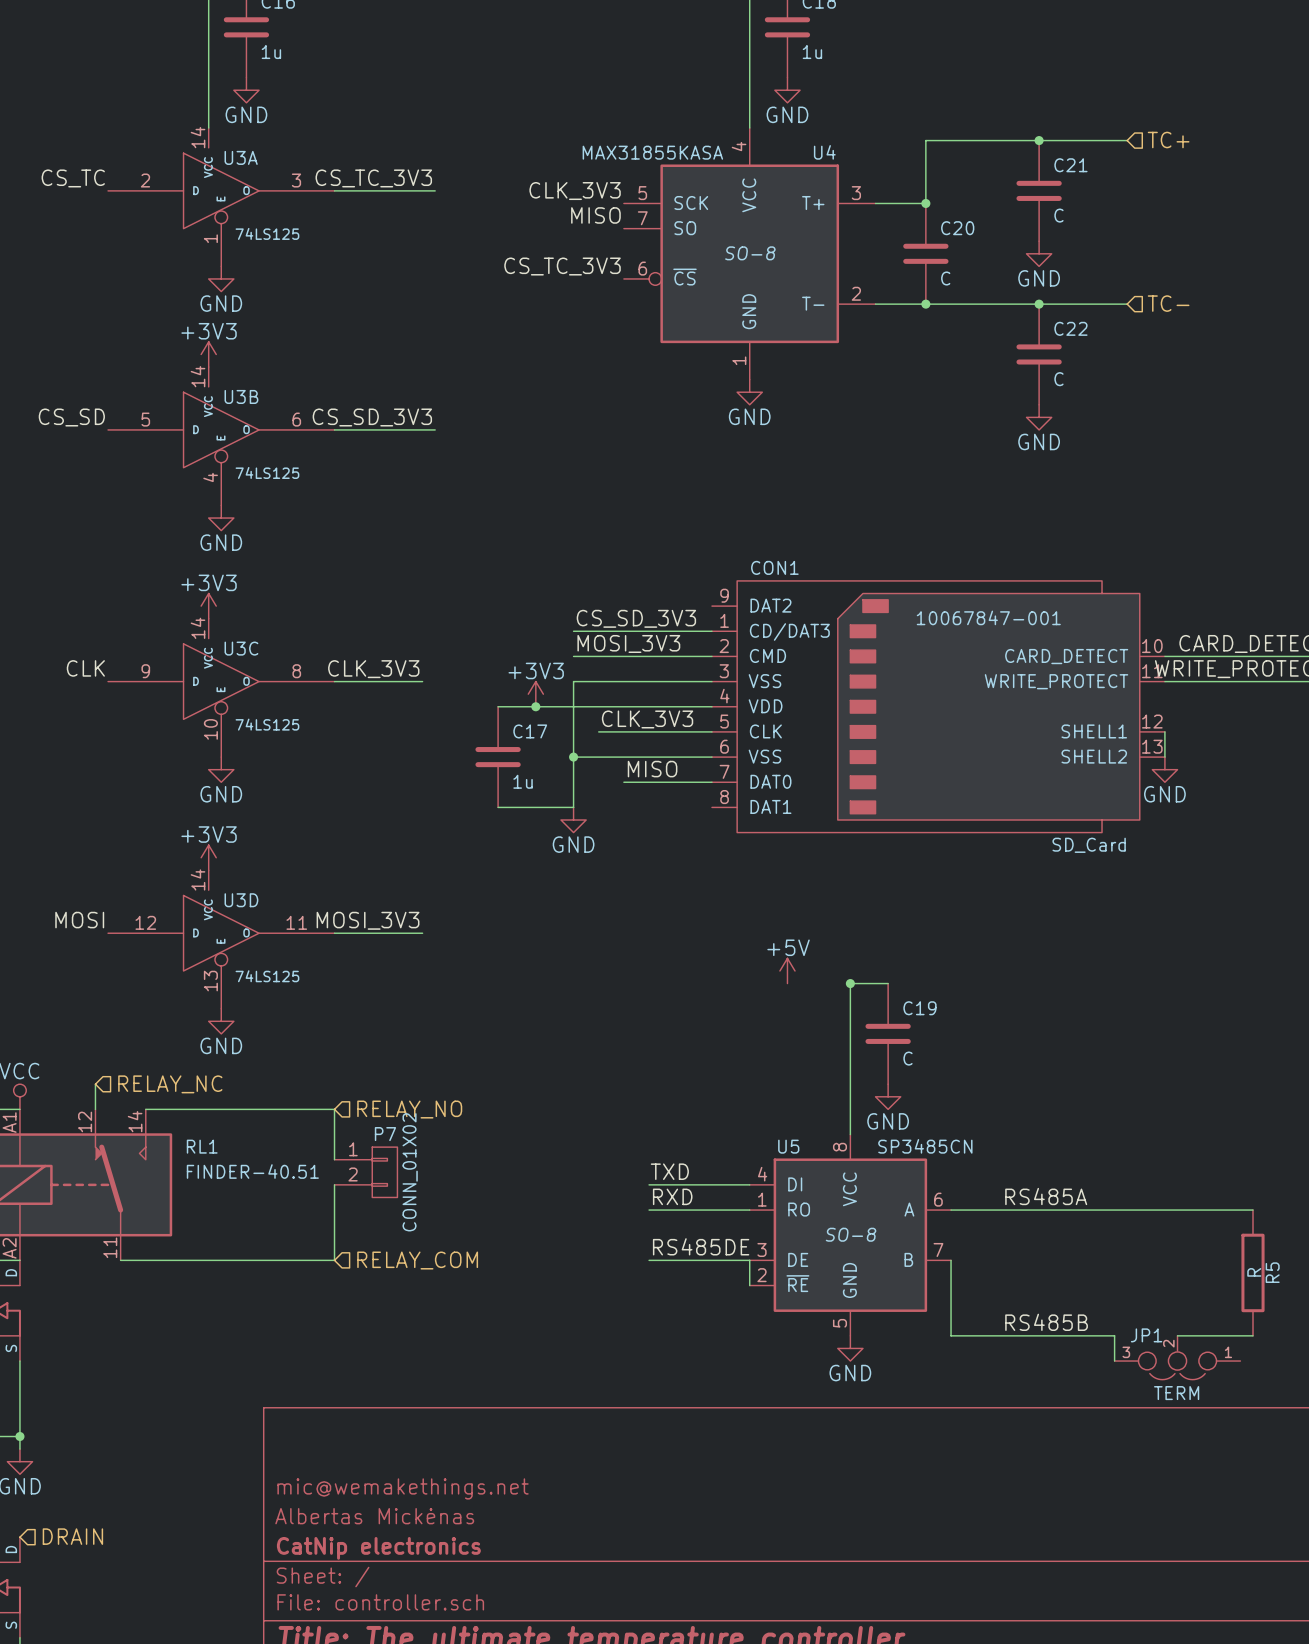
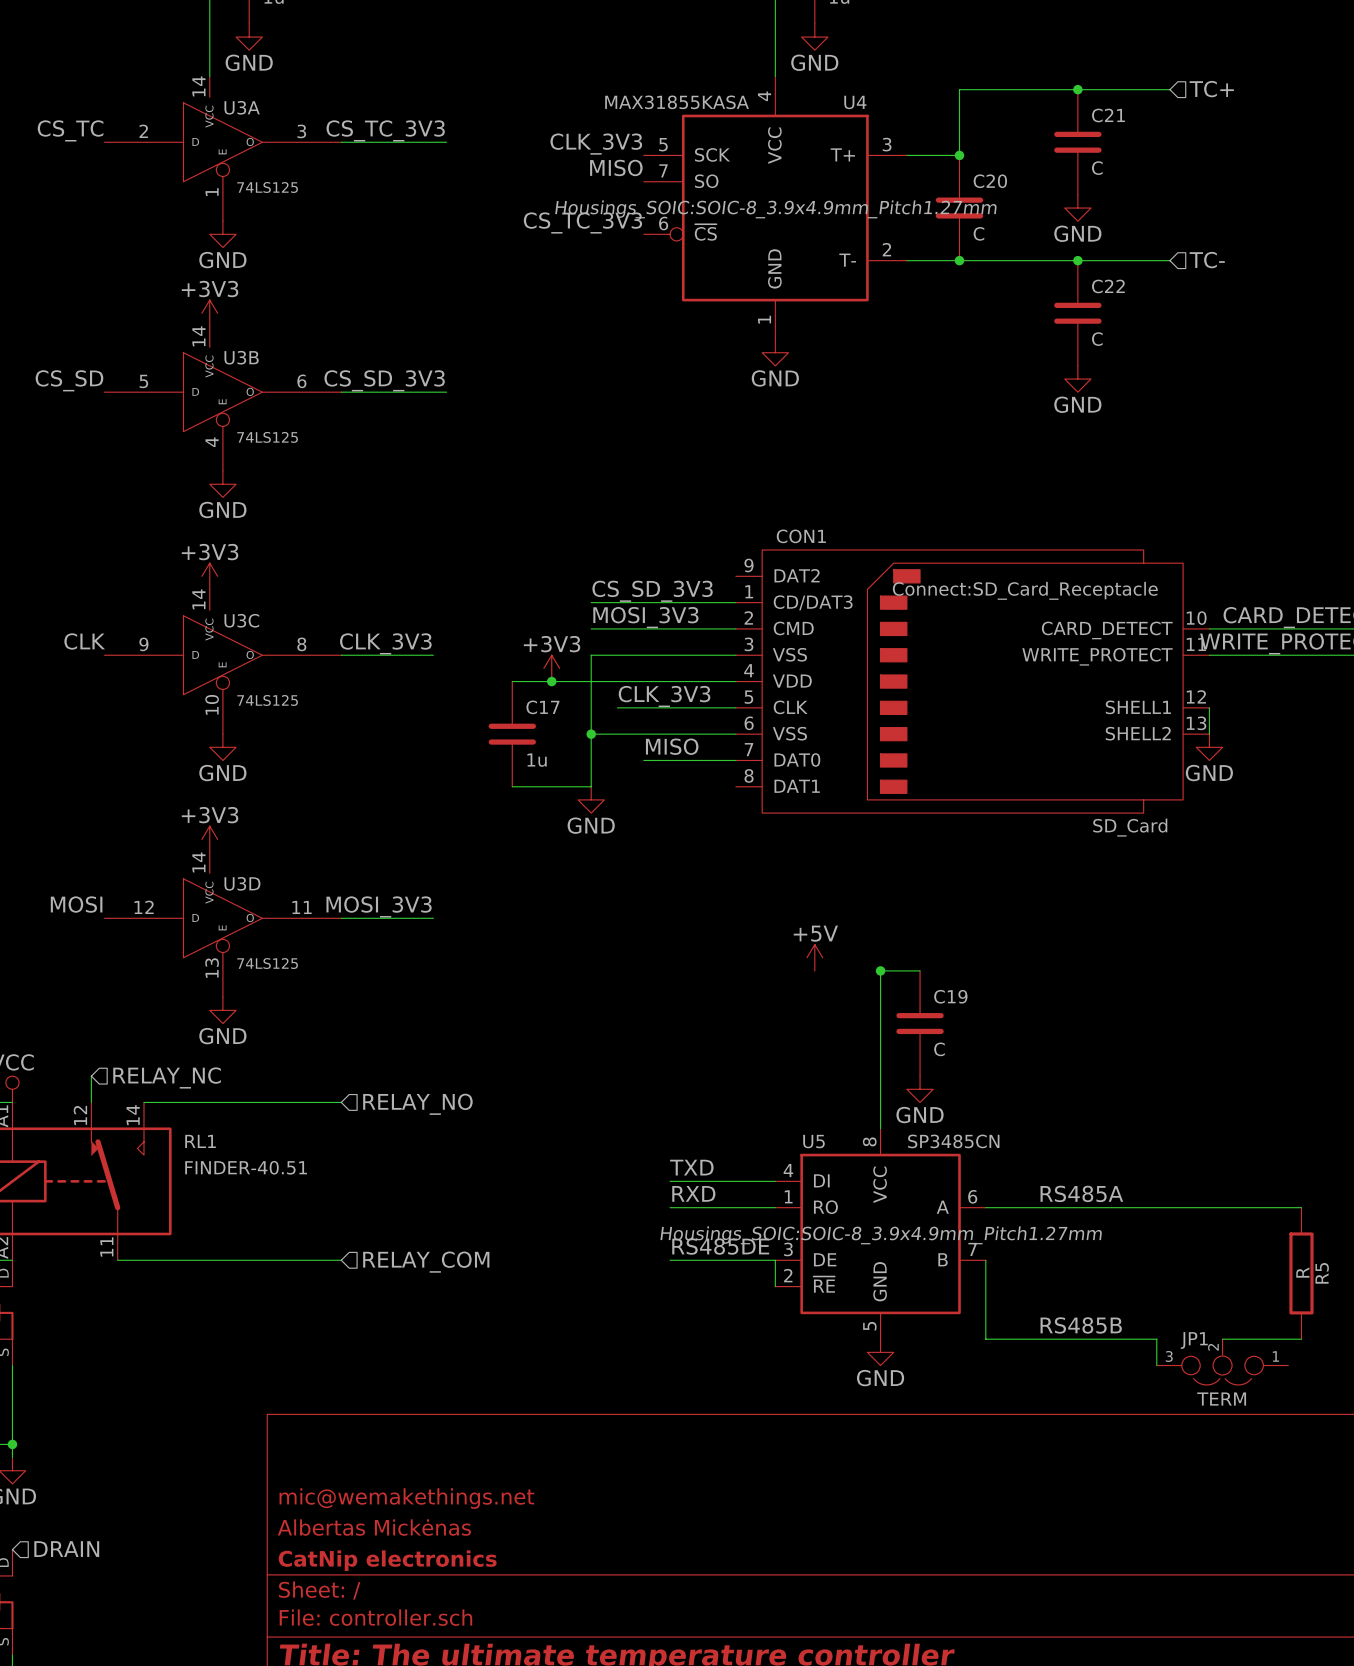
U4 text: SO-8 (750, 253) -> Housings_SOIC:SOIC-8_3.9x4.9mm_Pitch1.27mm (775, 209)
CON1 text: 10067847-001 (988, 617) -> Connect:SD_Card_Receptacle (1025, 590)
wire: (334, 1109) (334, 1159) -> none
P7: CONN_01X02 (365, 1172) -> none
wire: (334, 1184) (334, 1260) -> none
U5 text: SO-8 (851, 1234) -> Housings_SOIC:SOIC-8_3.9x4.9mm_Pitch1.27mm (881, 1235)

